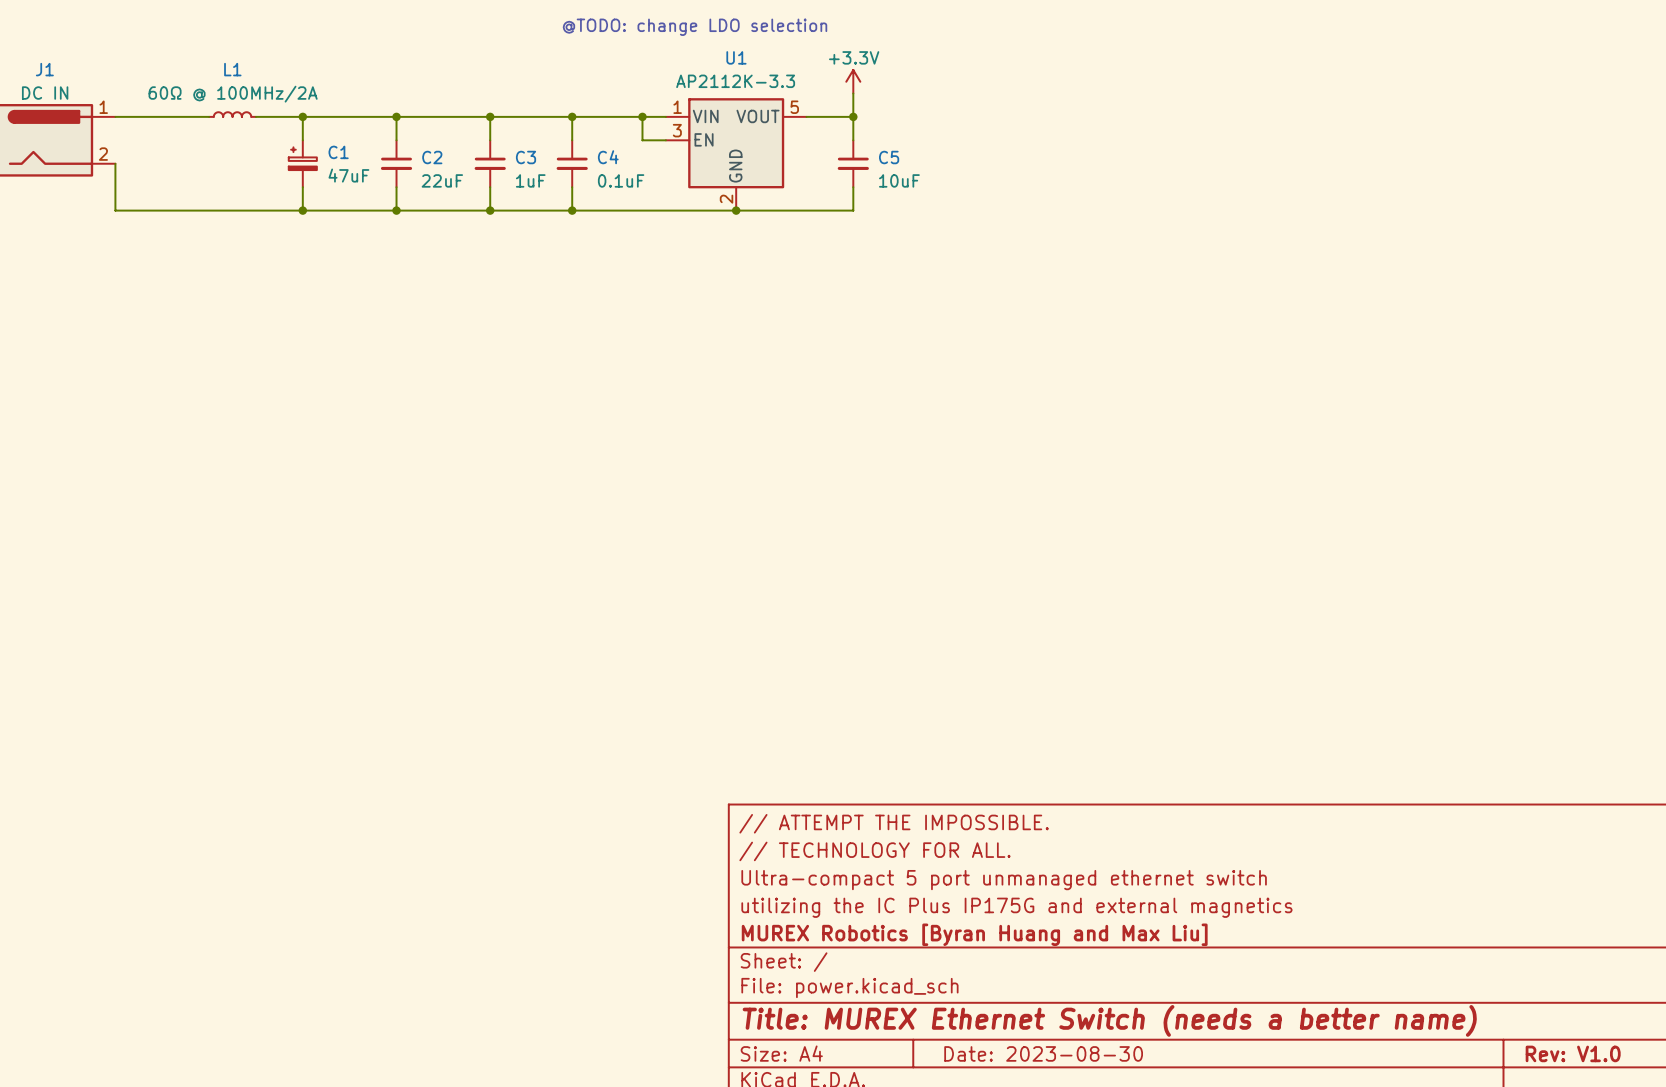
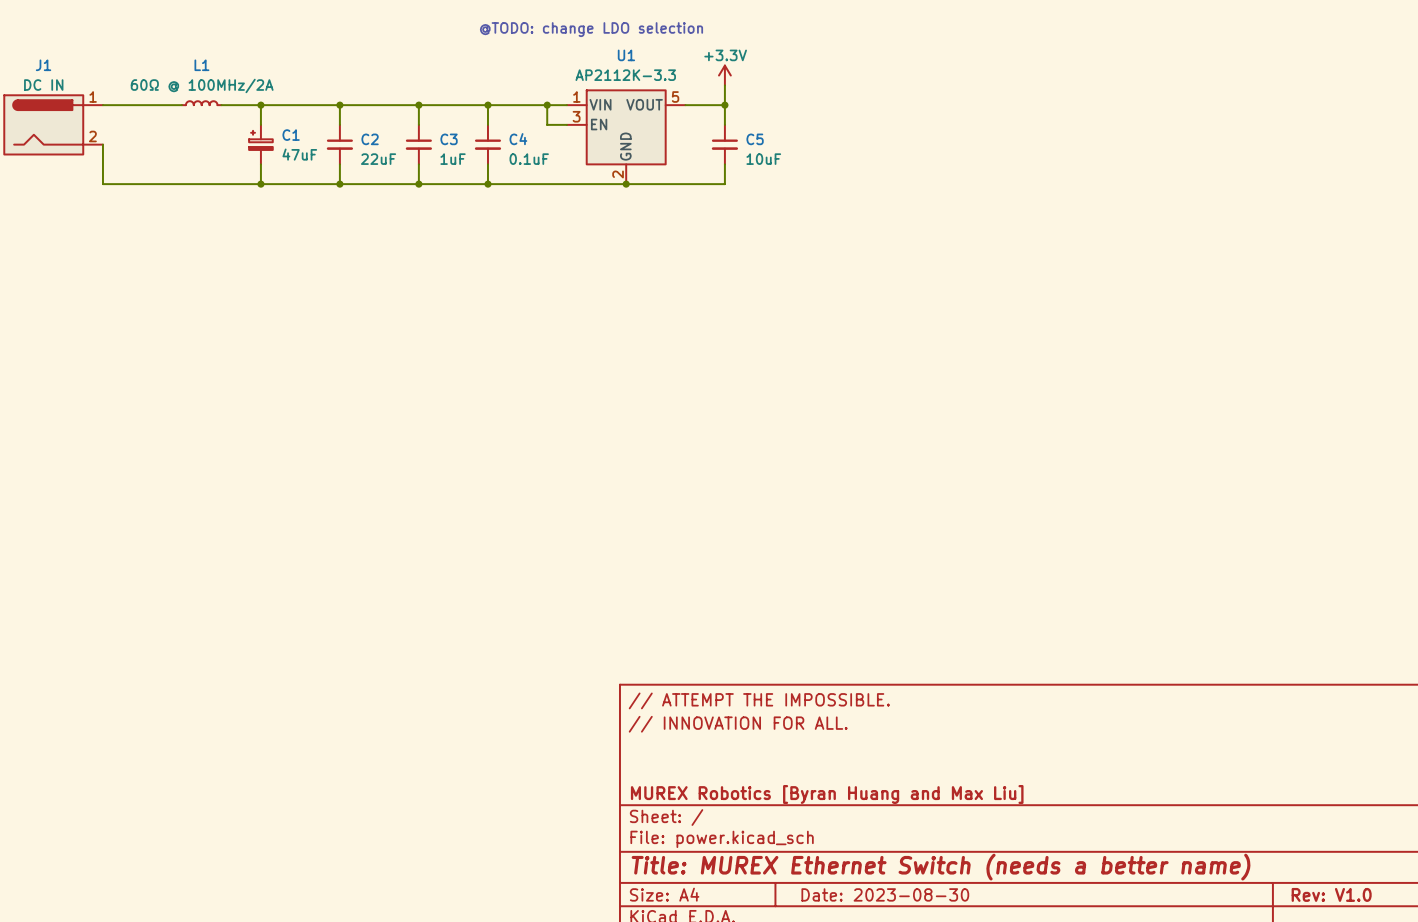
title block: // TECHNOLOGY FOR ALL. (874, 851) -> // INNOVATION FOR ALL. (738, 724)
title block: Ultra-compact 5 port unmanaged ethernet switch (1004, 880) -> none
title block: utilizing the IC Plus IP175G and external magnetics (1016, 907) -> none

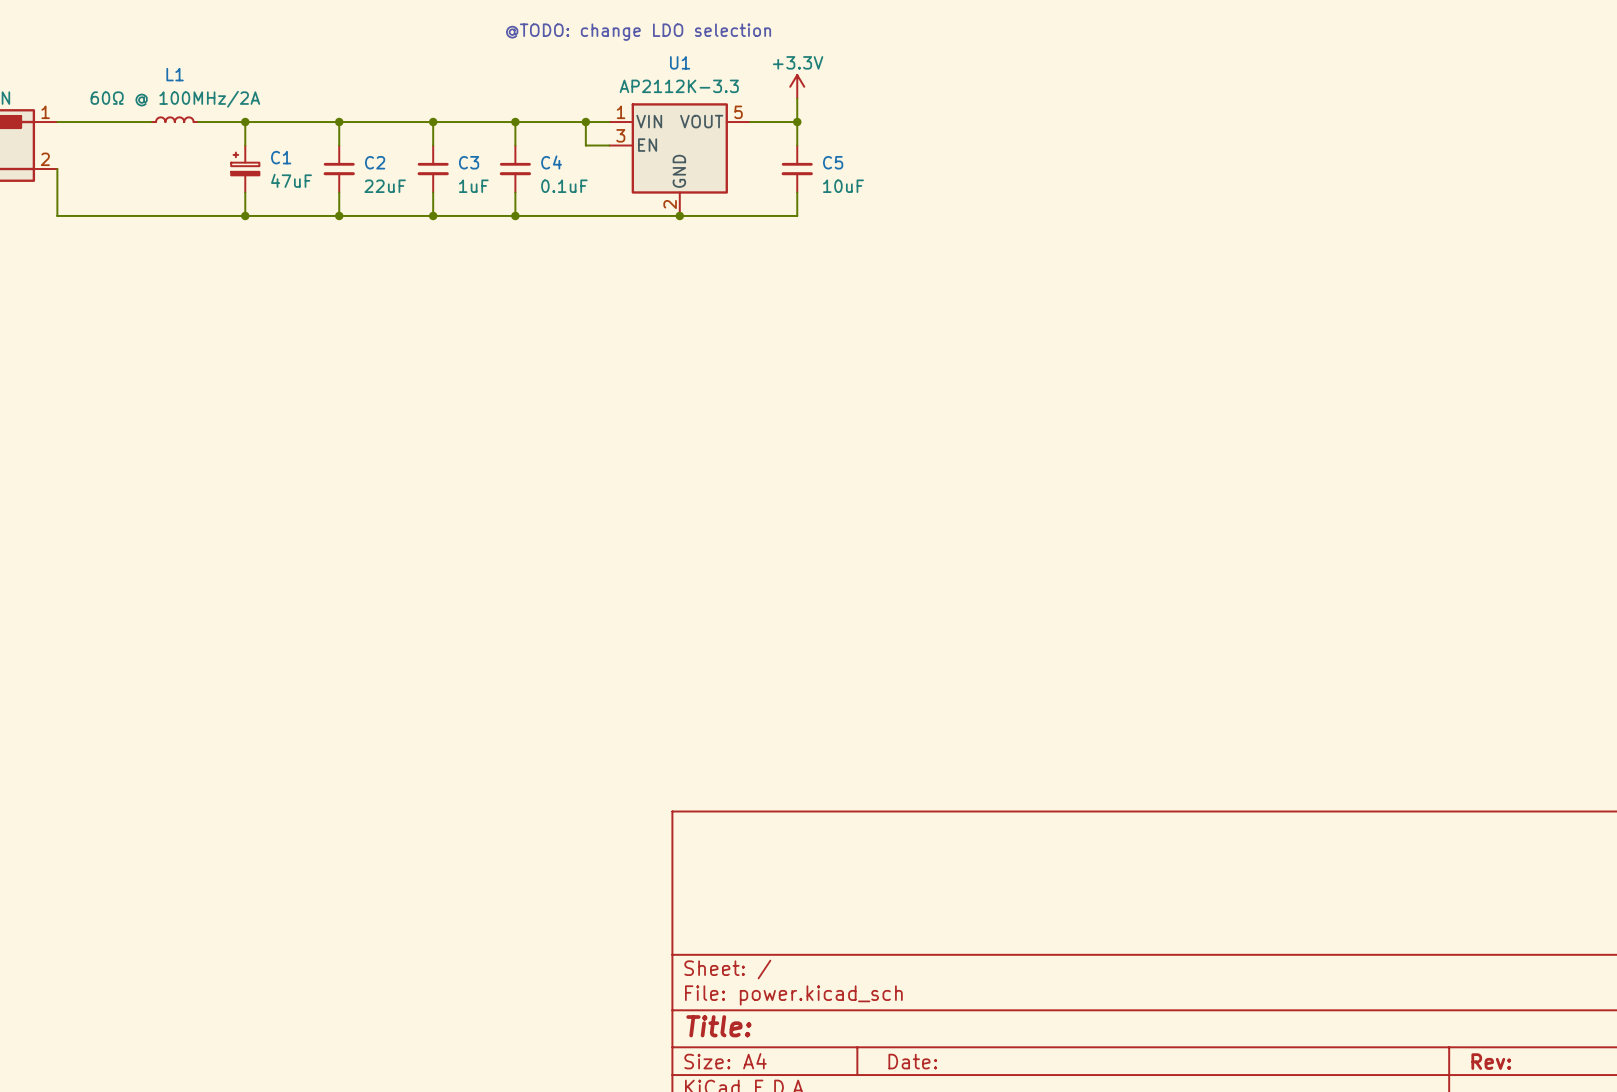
title block: // ATTEMPT THE IMPOSSIBLE. (759, 700) -> none
title block: // INNOVATION FOR ALL. (738, 724) -> none
title block: MUREX Robotics [Byran Huang and Max Liu] (827, 794) -> none
title block: Title: MUREX Ethernet Switch (needs a better name) (941, 867) -> Title: (718, 1026)
title block: Date: 2023-08-30 (885, 894) -> Date: (912, 1061)
title block: Rev: V1.0 (1331, 894) -> Rev: (1491, 1061)

